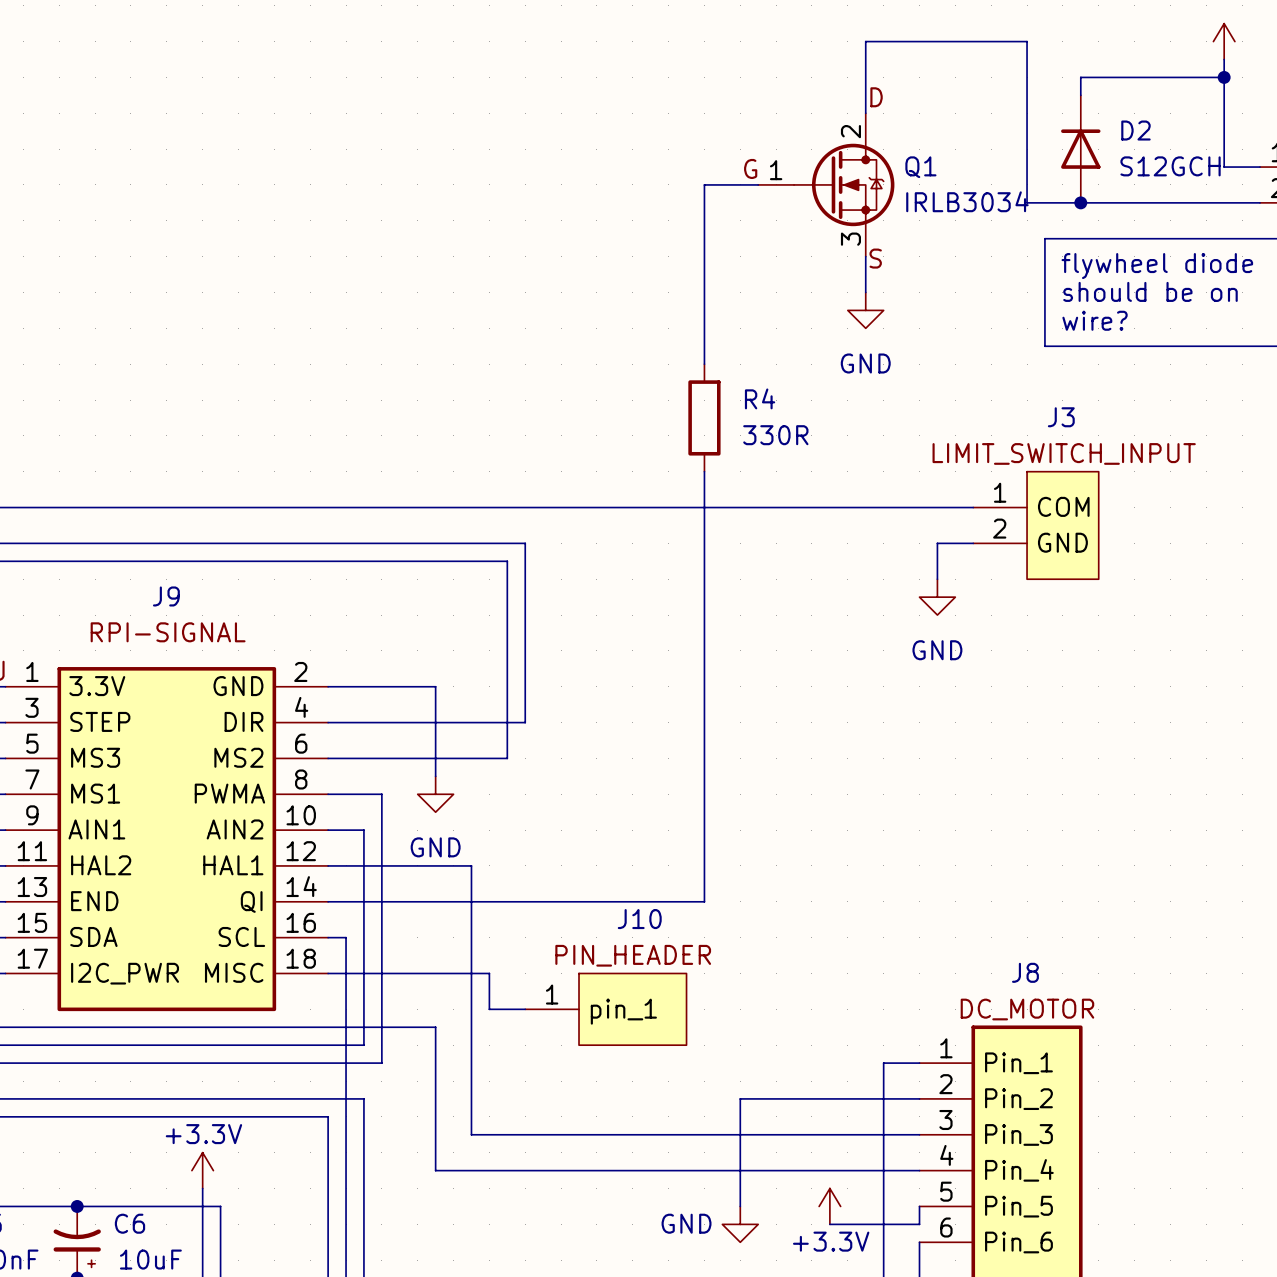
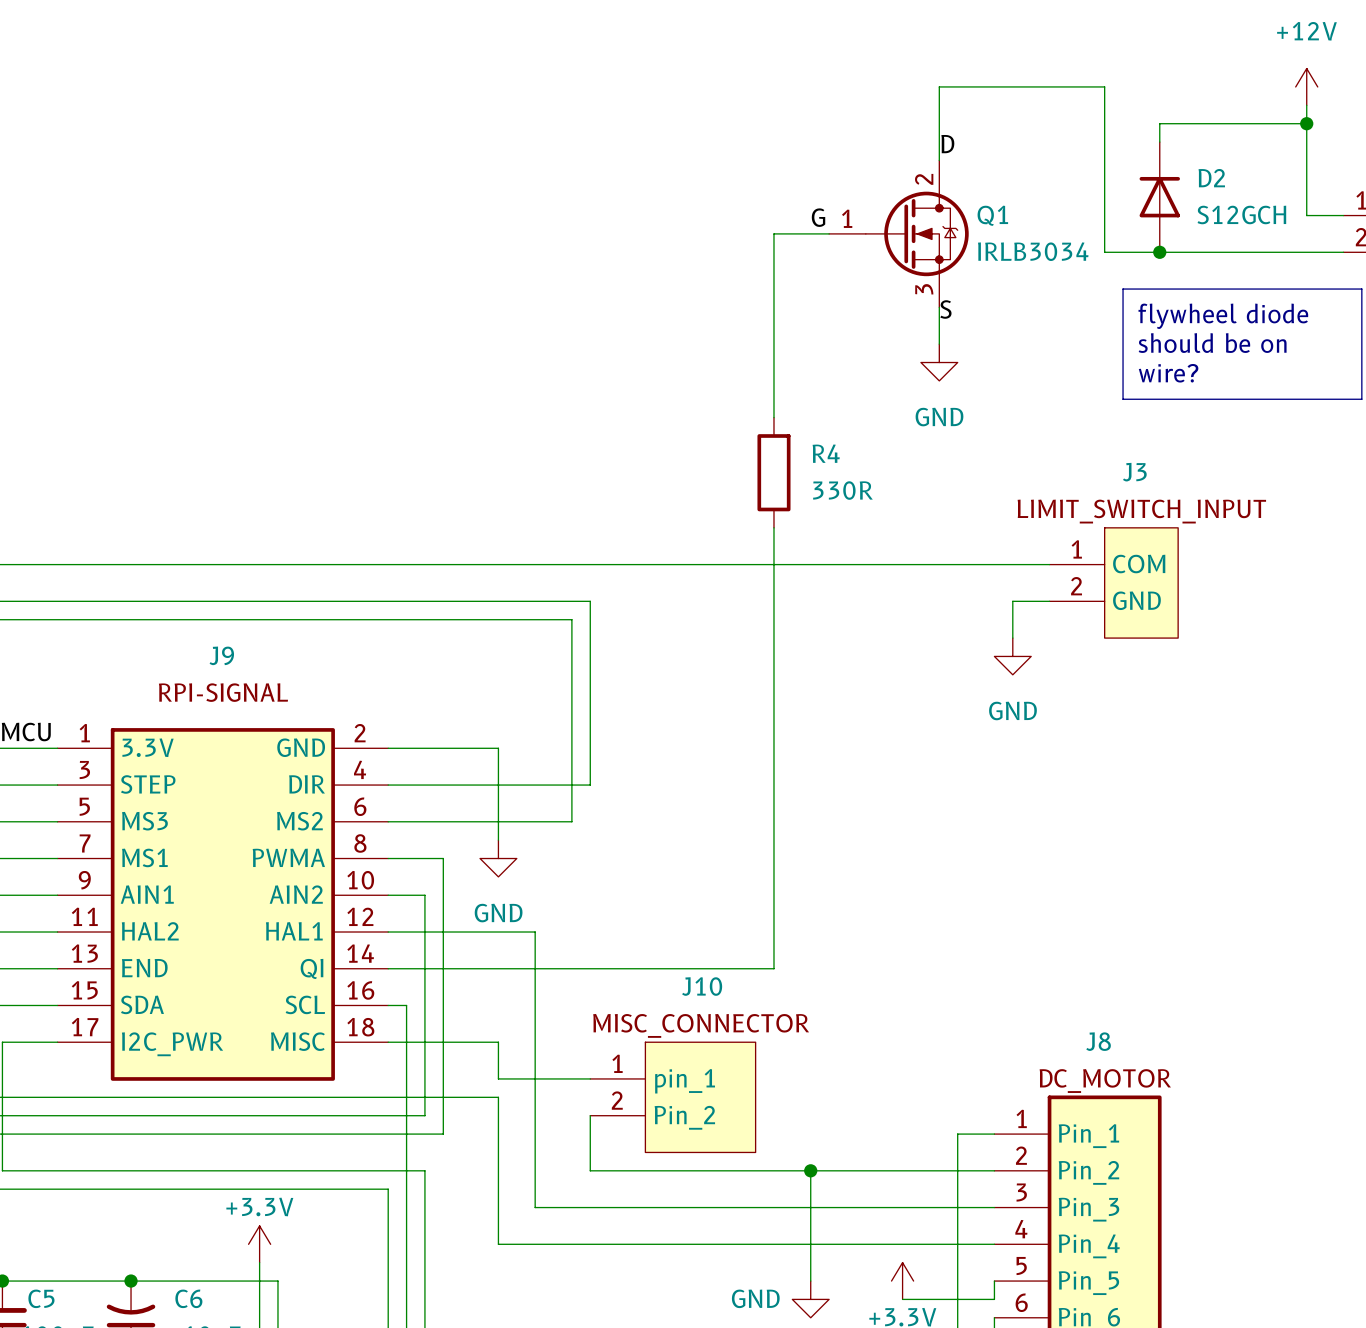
wire: (435, 973) (489, 973) (489, 1009) -> (498, 1042) (498, 1078) (553, 1078)
J10 symbol: [525, 973, 687, 1046] -> [590, 1042, 756, 1153]
wire: none -> (590, 1115) (590, 1170) (810, 1170)
junction: none -> (810, 1170)

